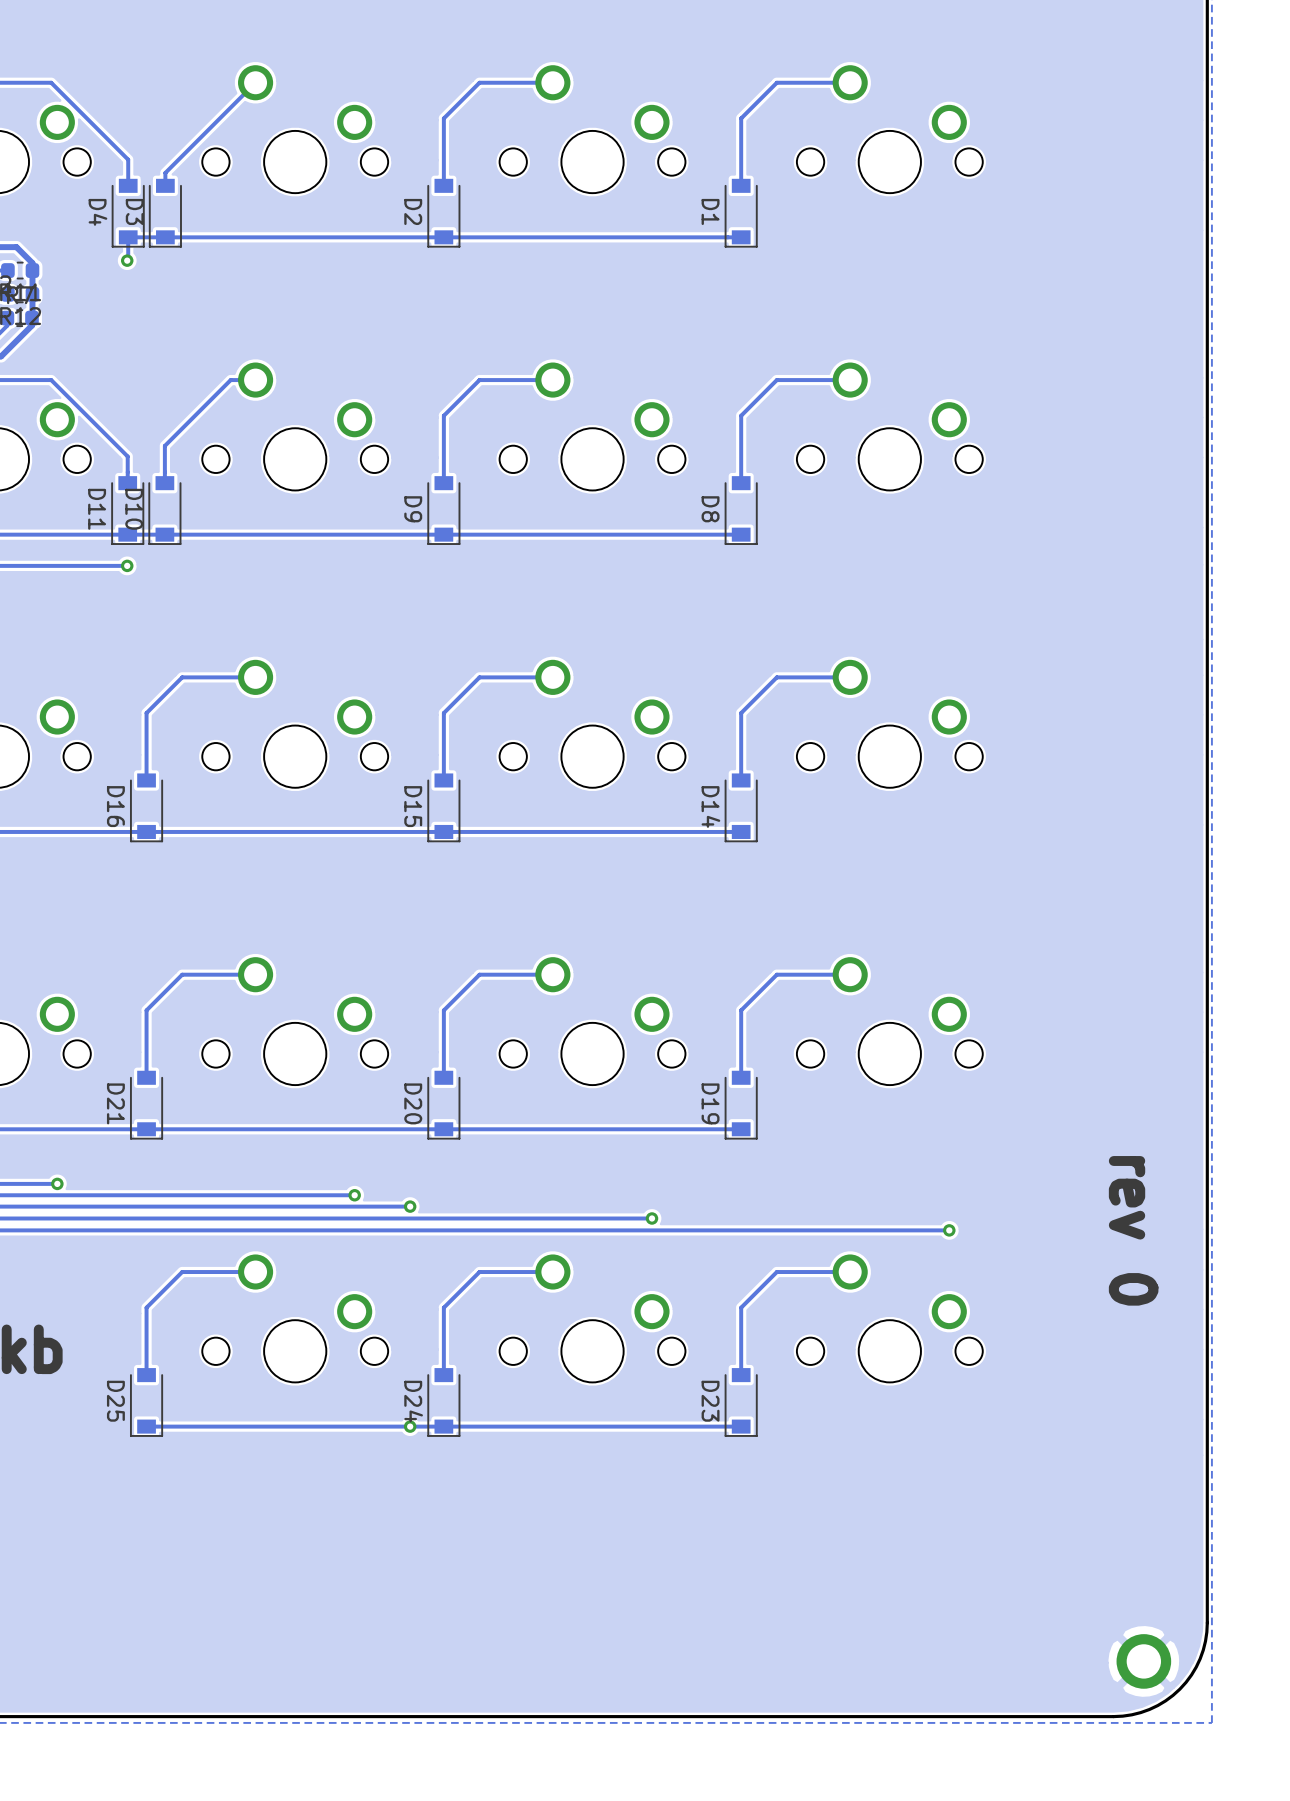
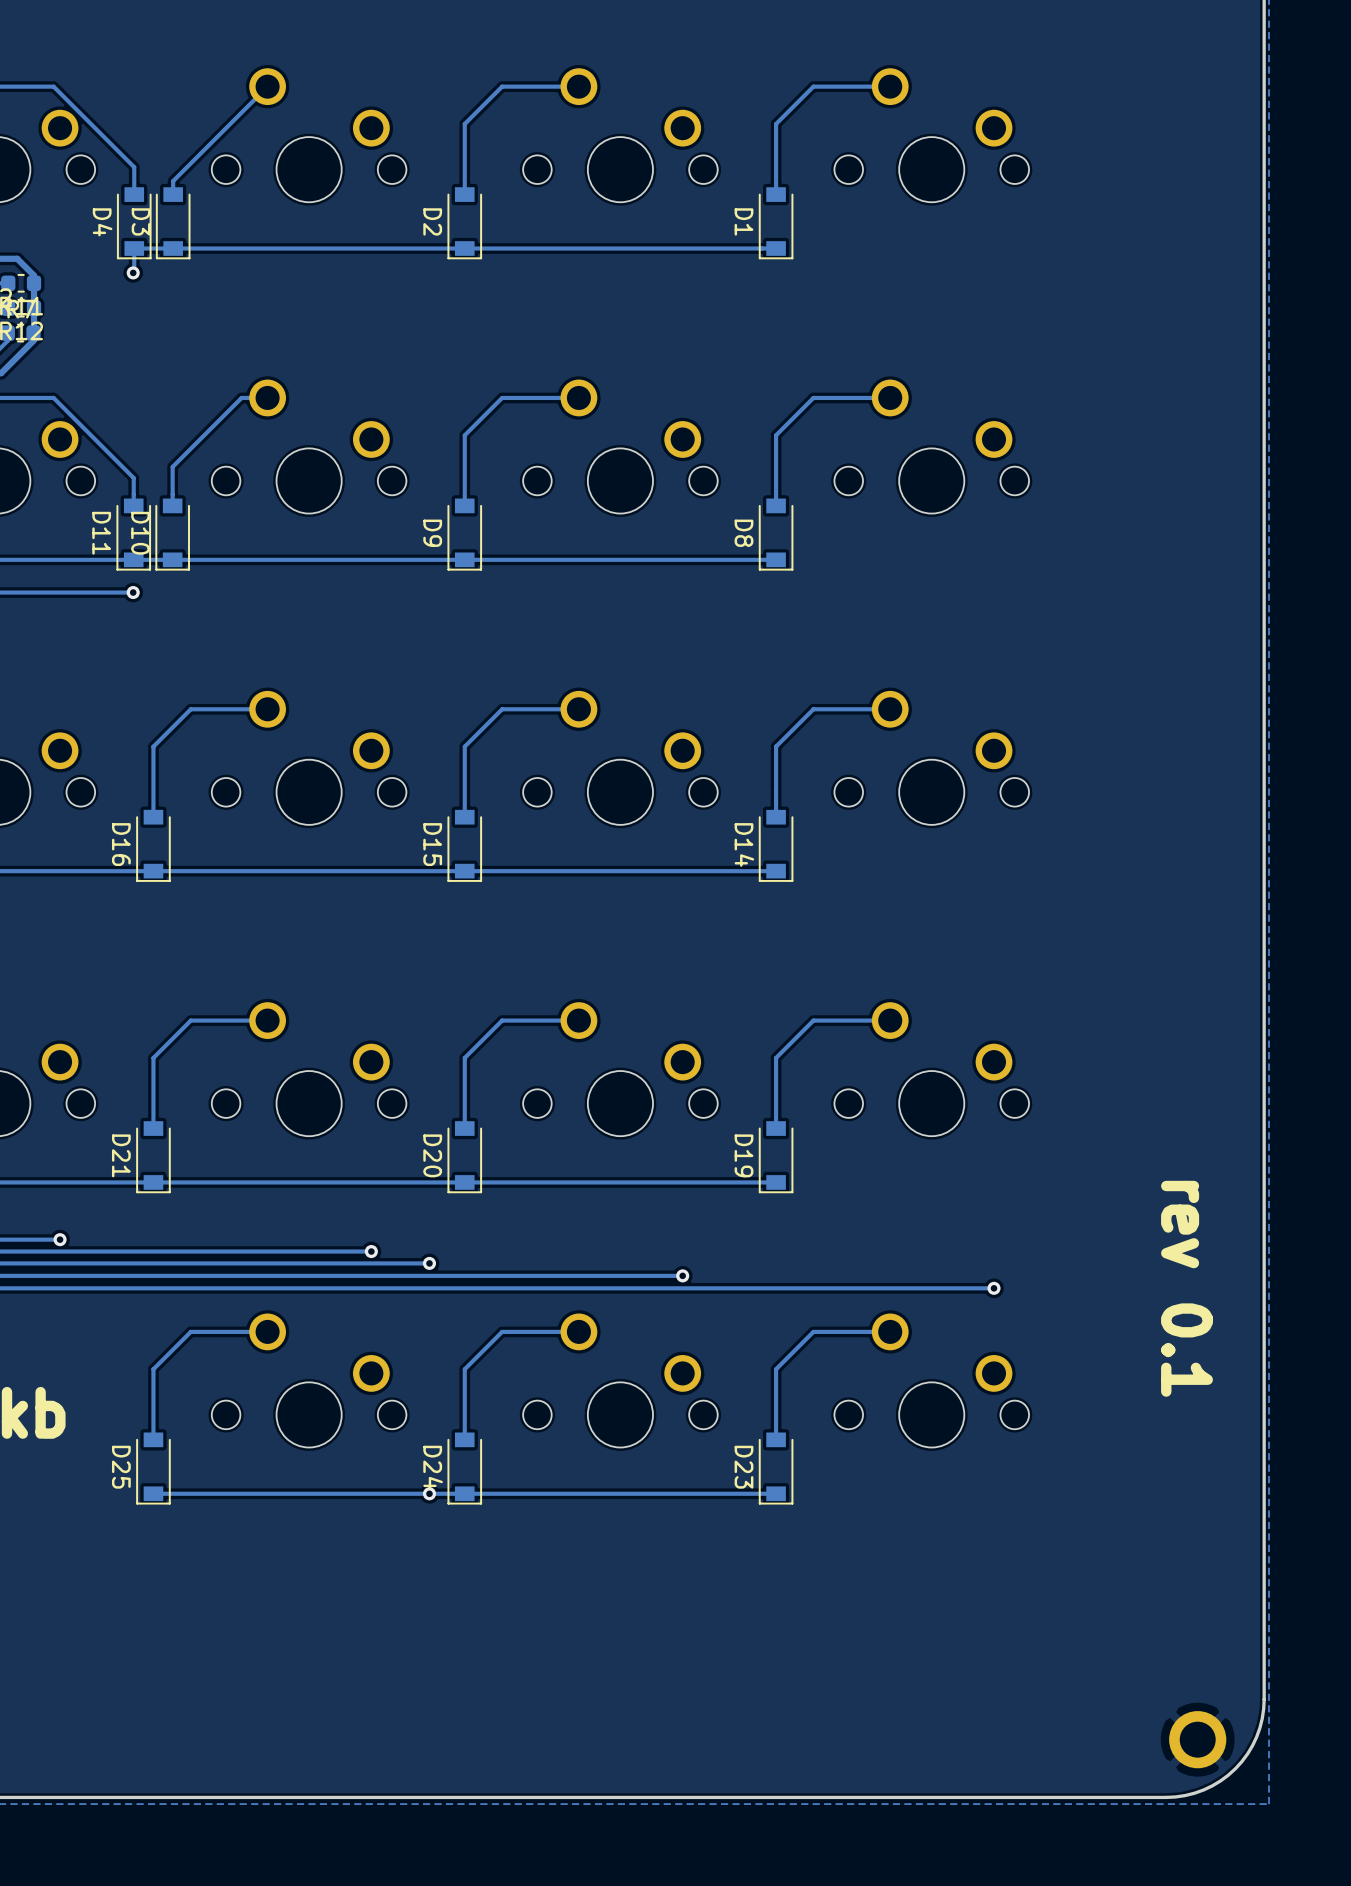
text: rev 0 (1133, 1230) -> rev 0.1 (1187, 1288)

